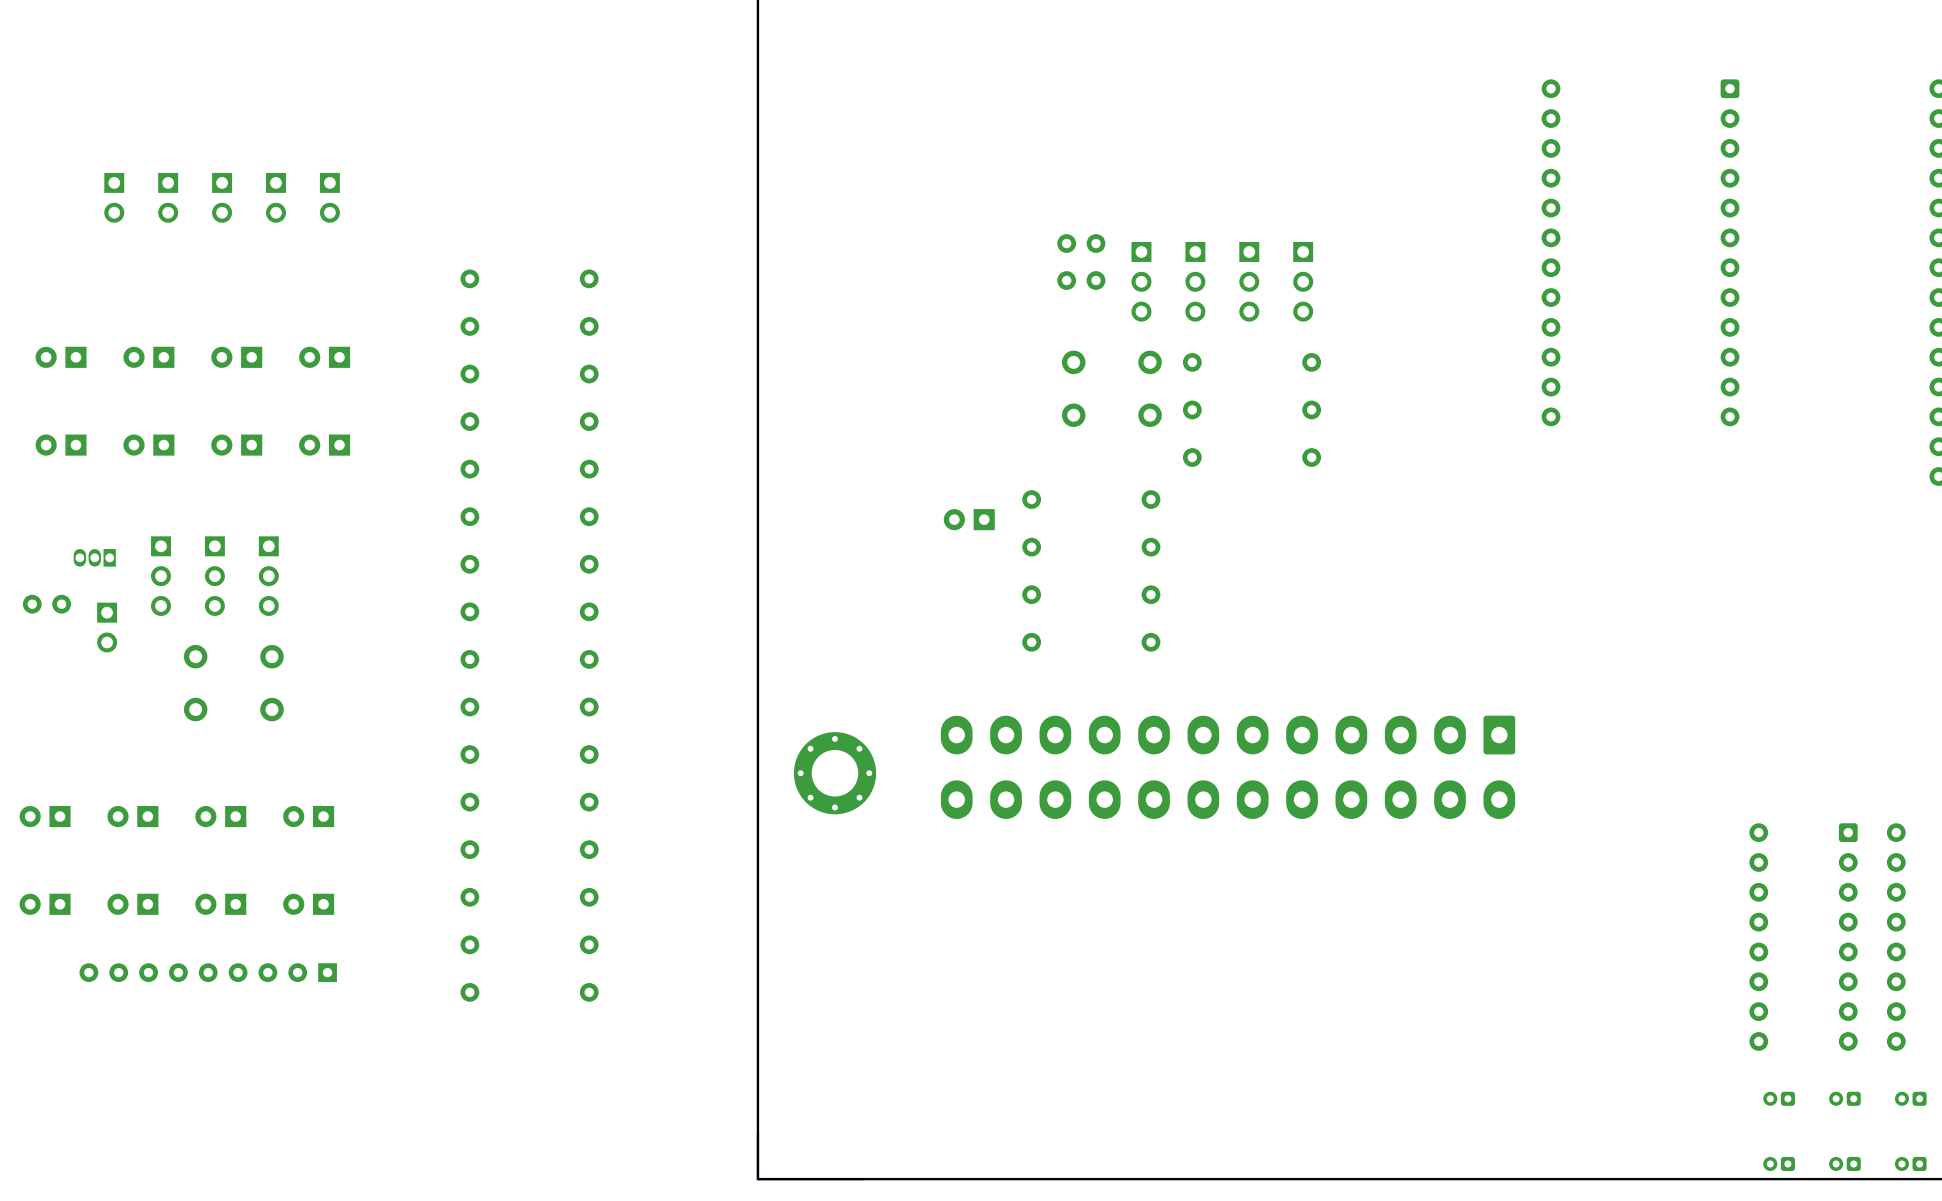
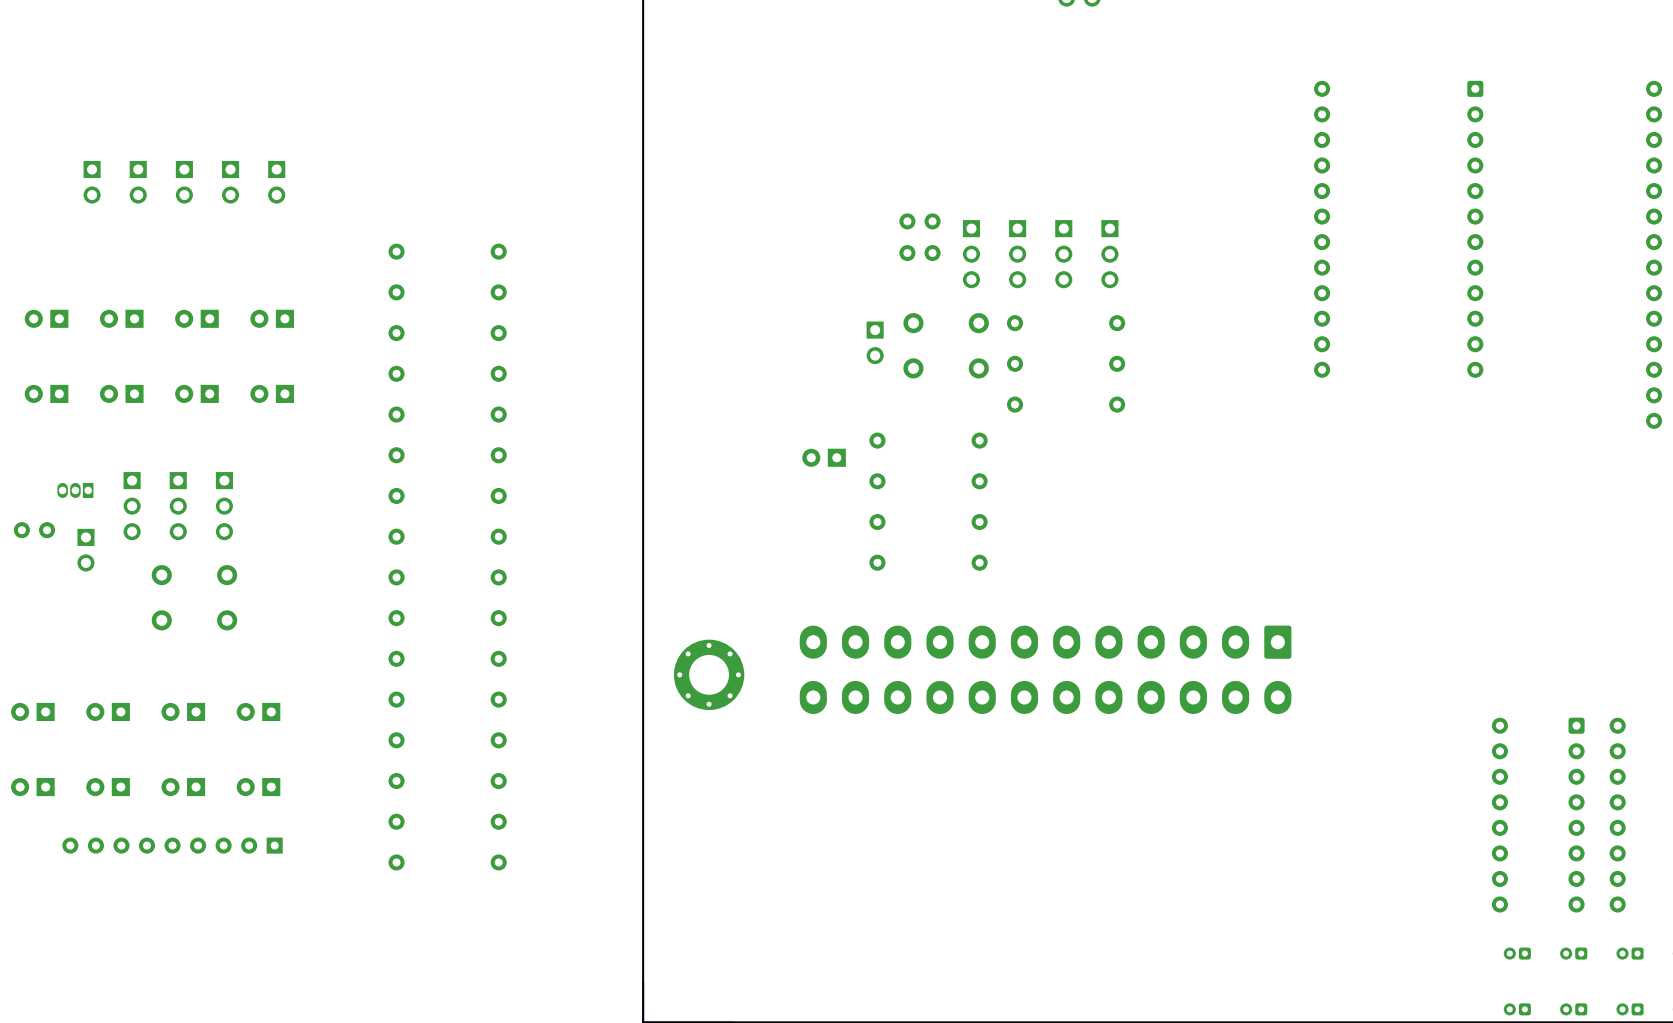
part: none -> (875, 342)

